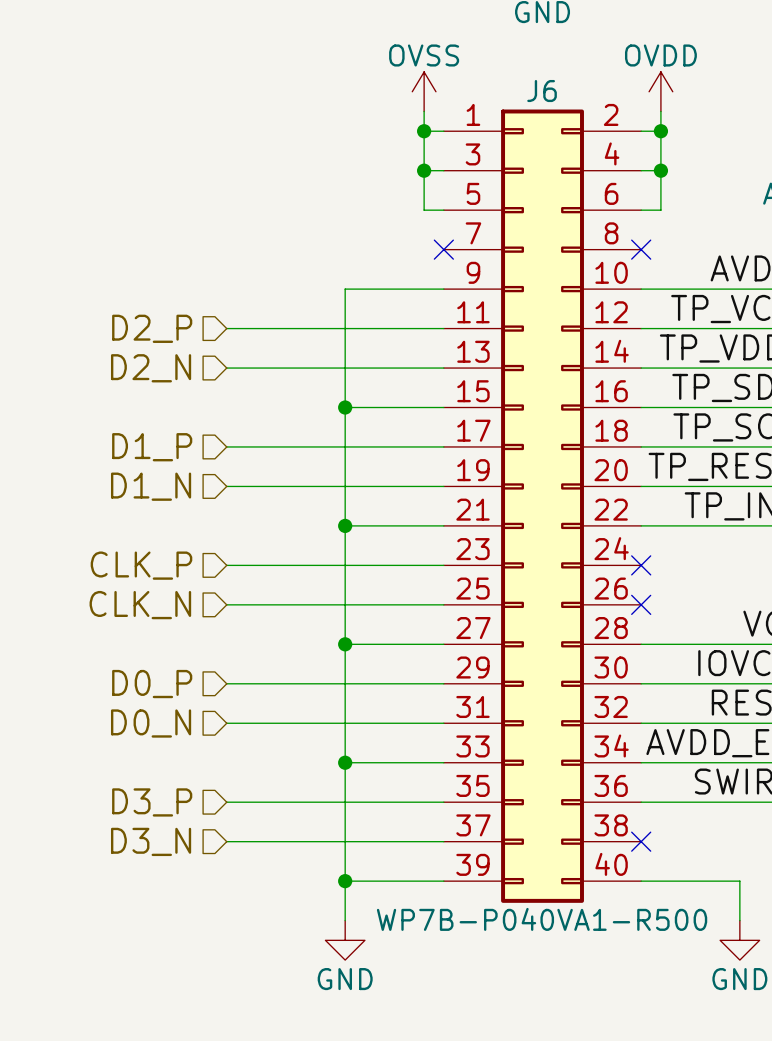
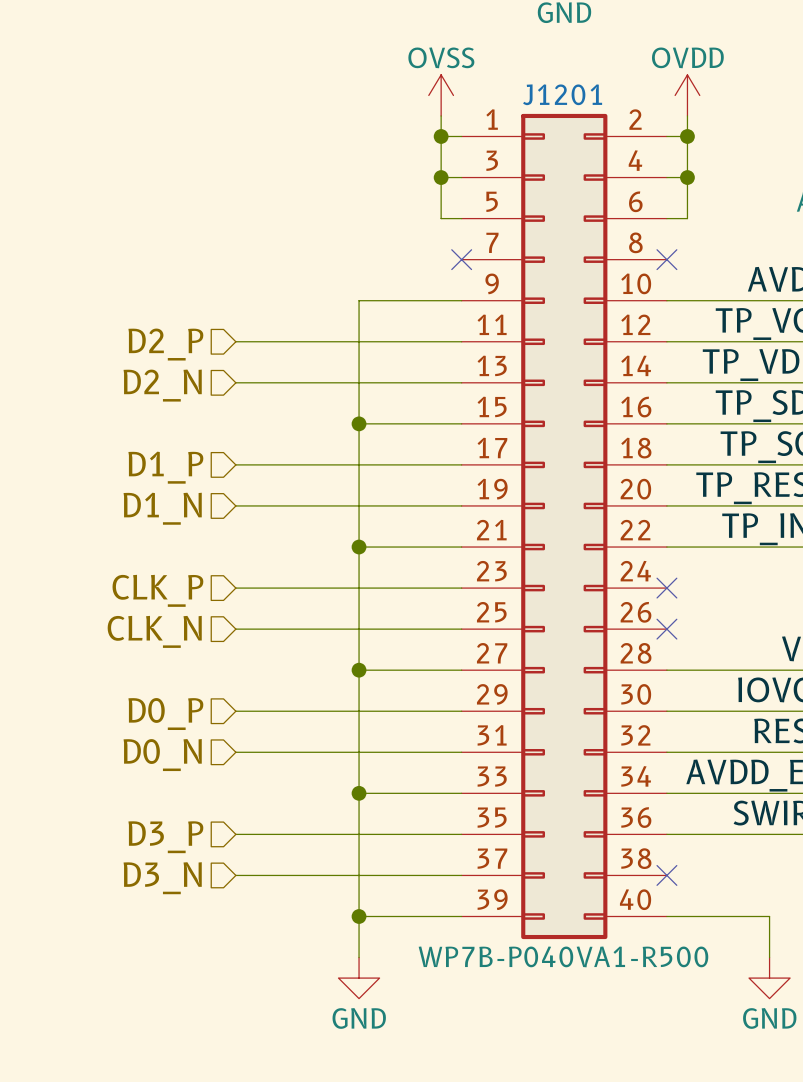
J6 name: J6 (542, 91) -> J1201 (562, 94)

